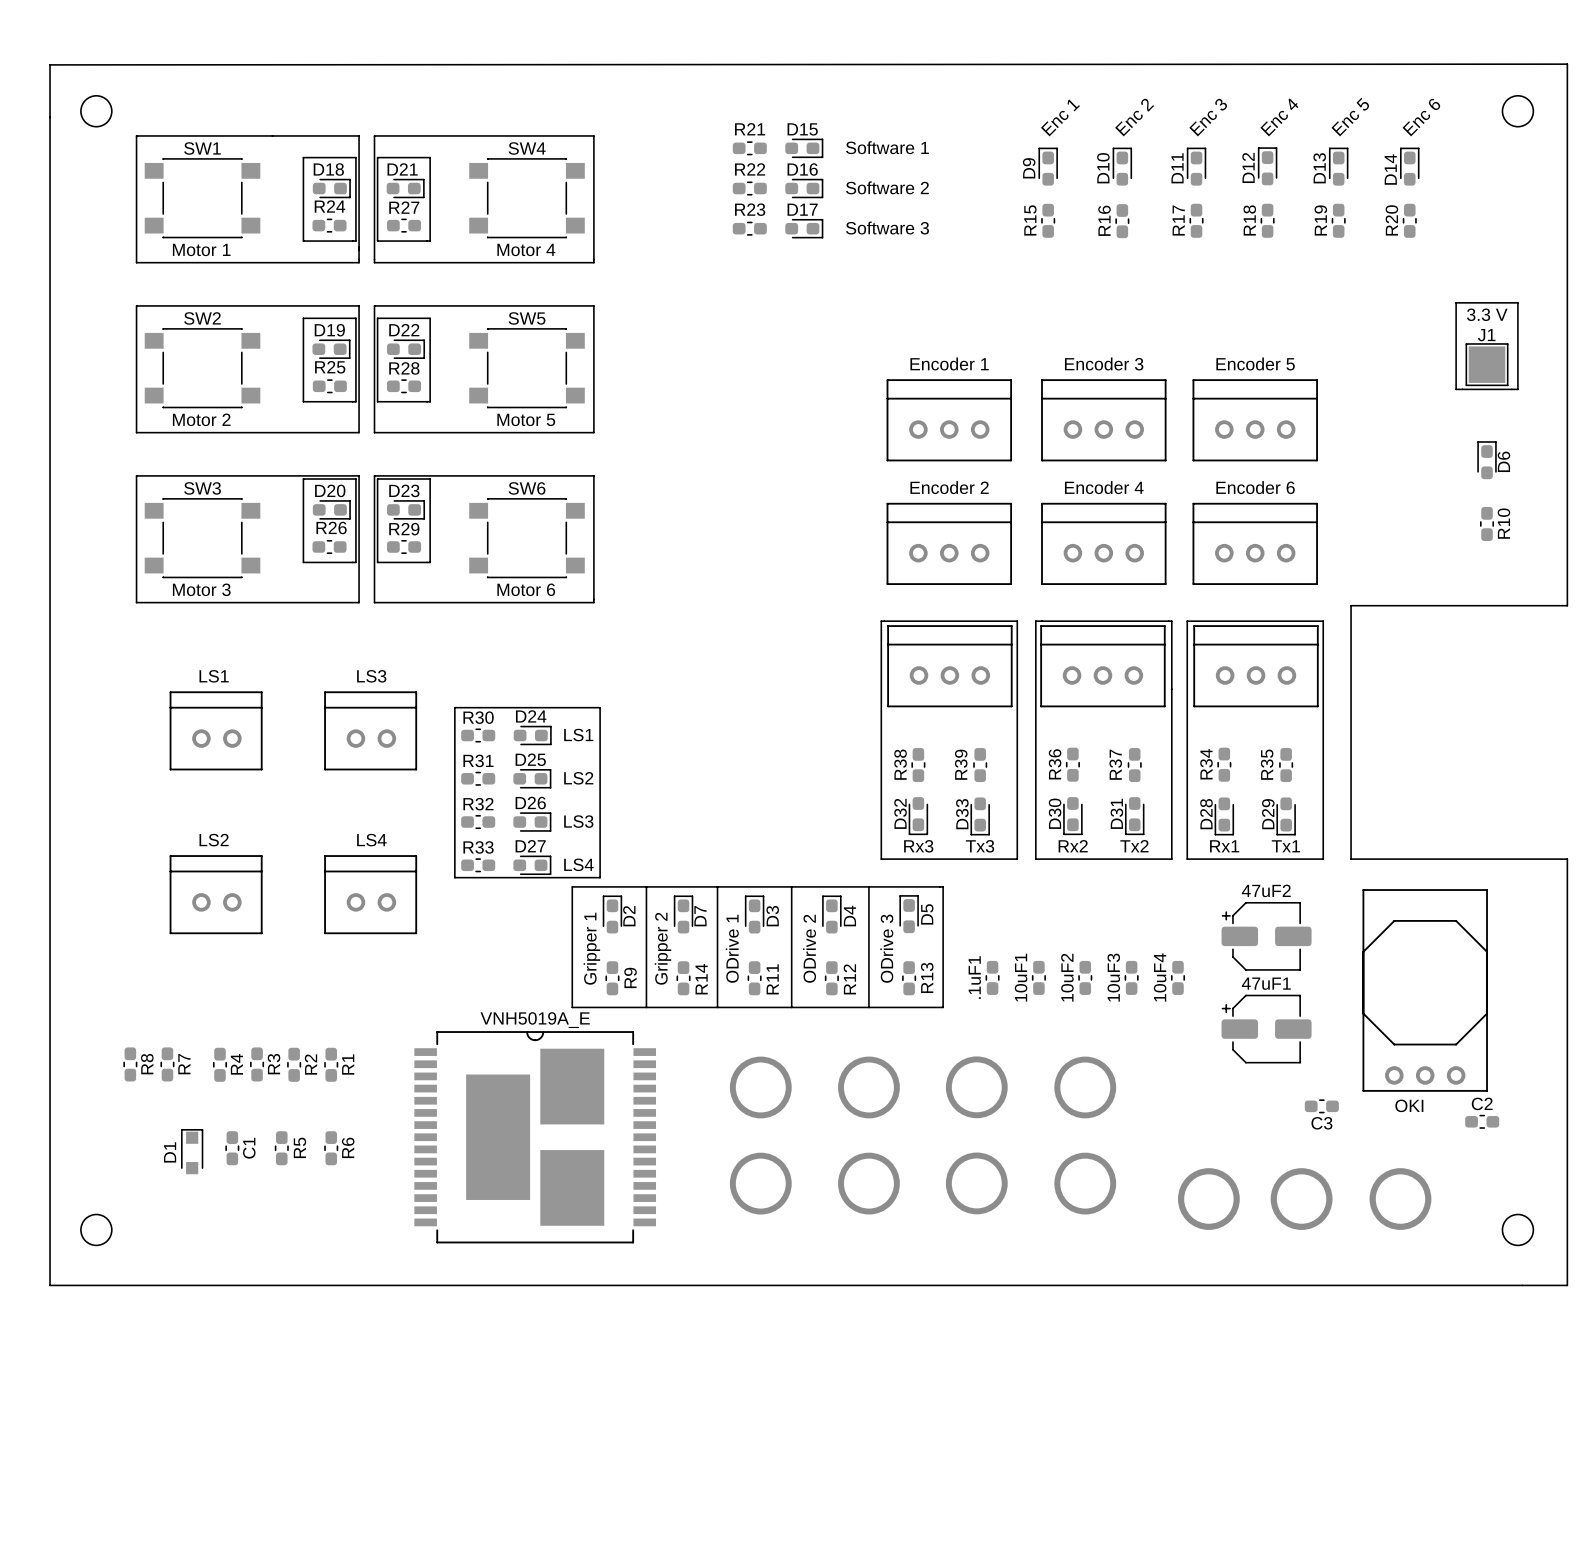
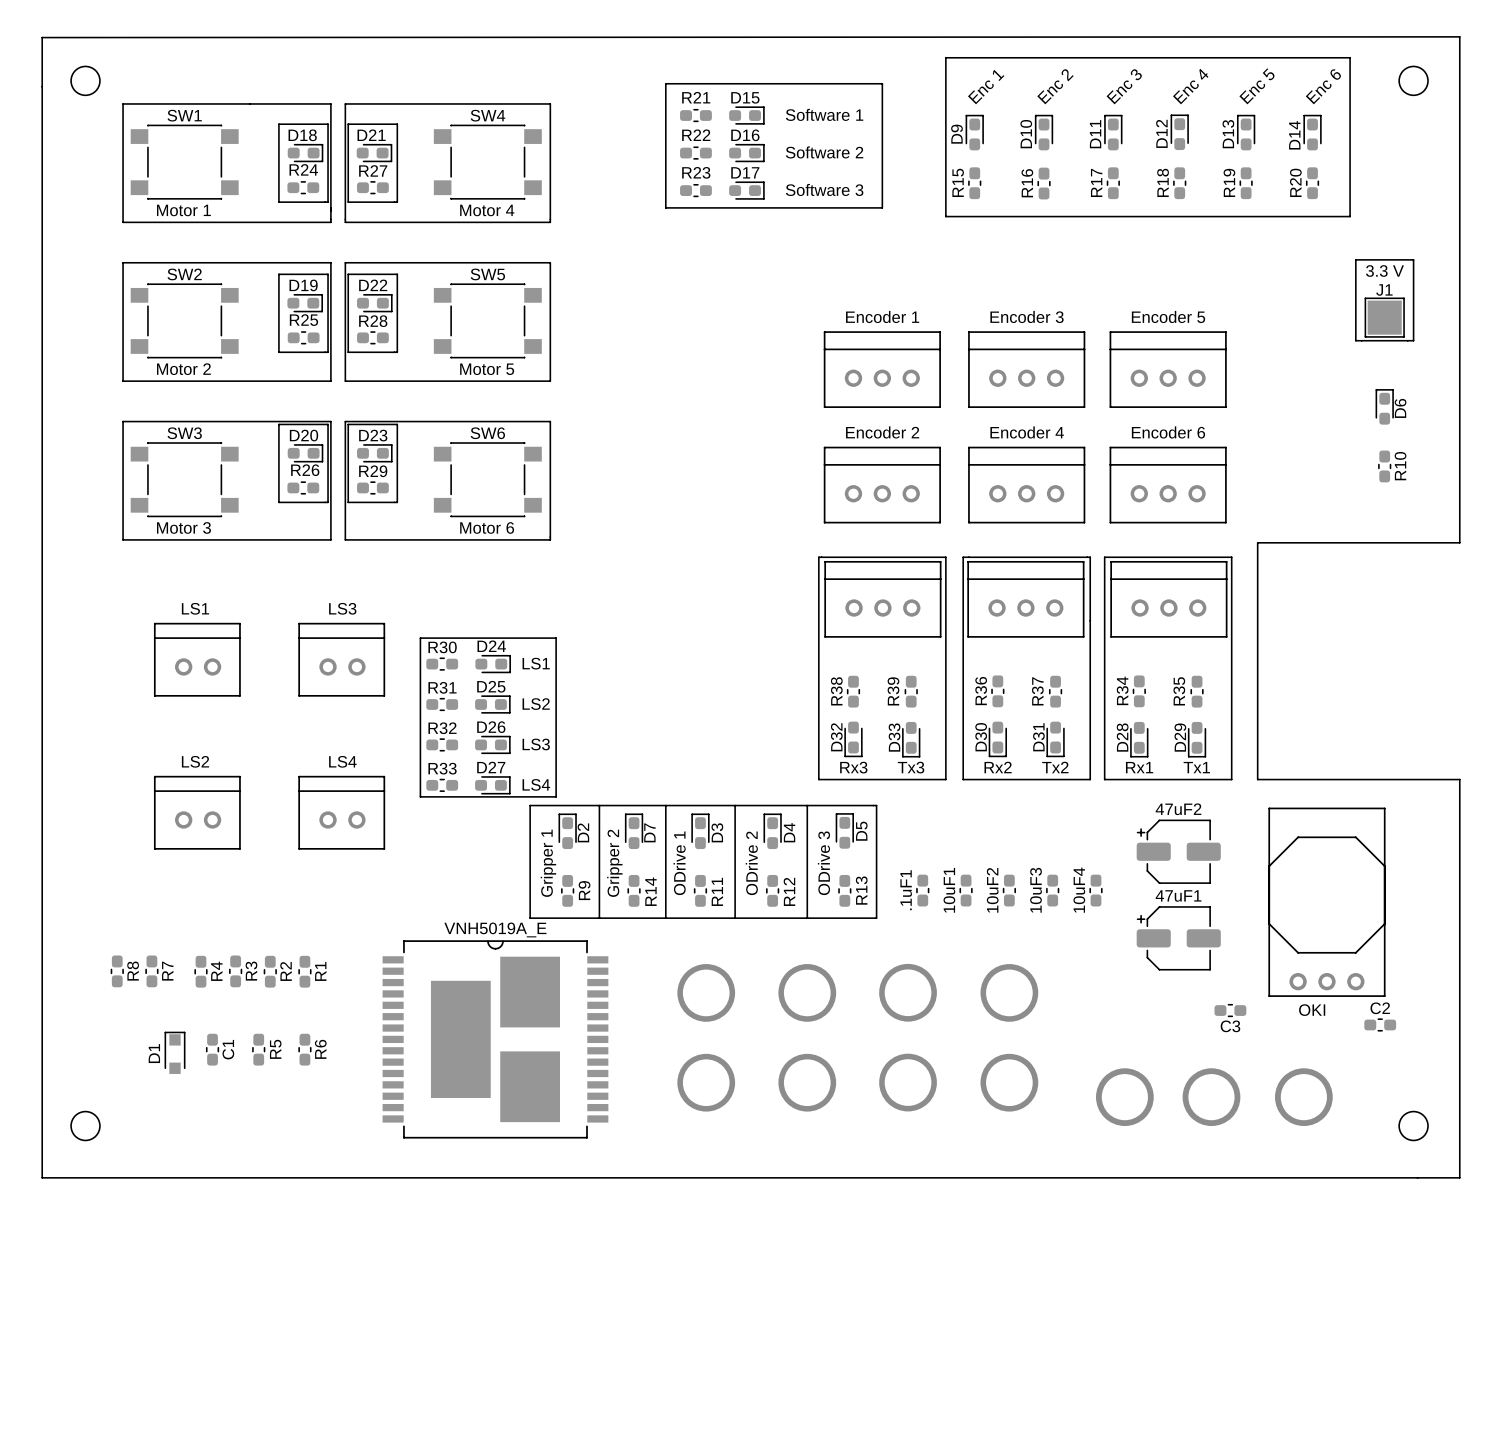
line: none -> (945, 57) (1350, 57) (1350, 216) (945, 216) (945, 57)
line: none -> (665, 83) (882, 83) (882, 207) (665, 207) (665, 83)

